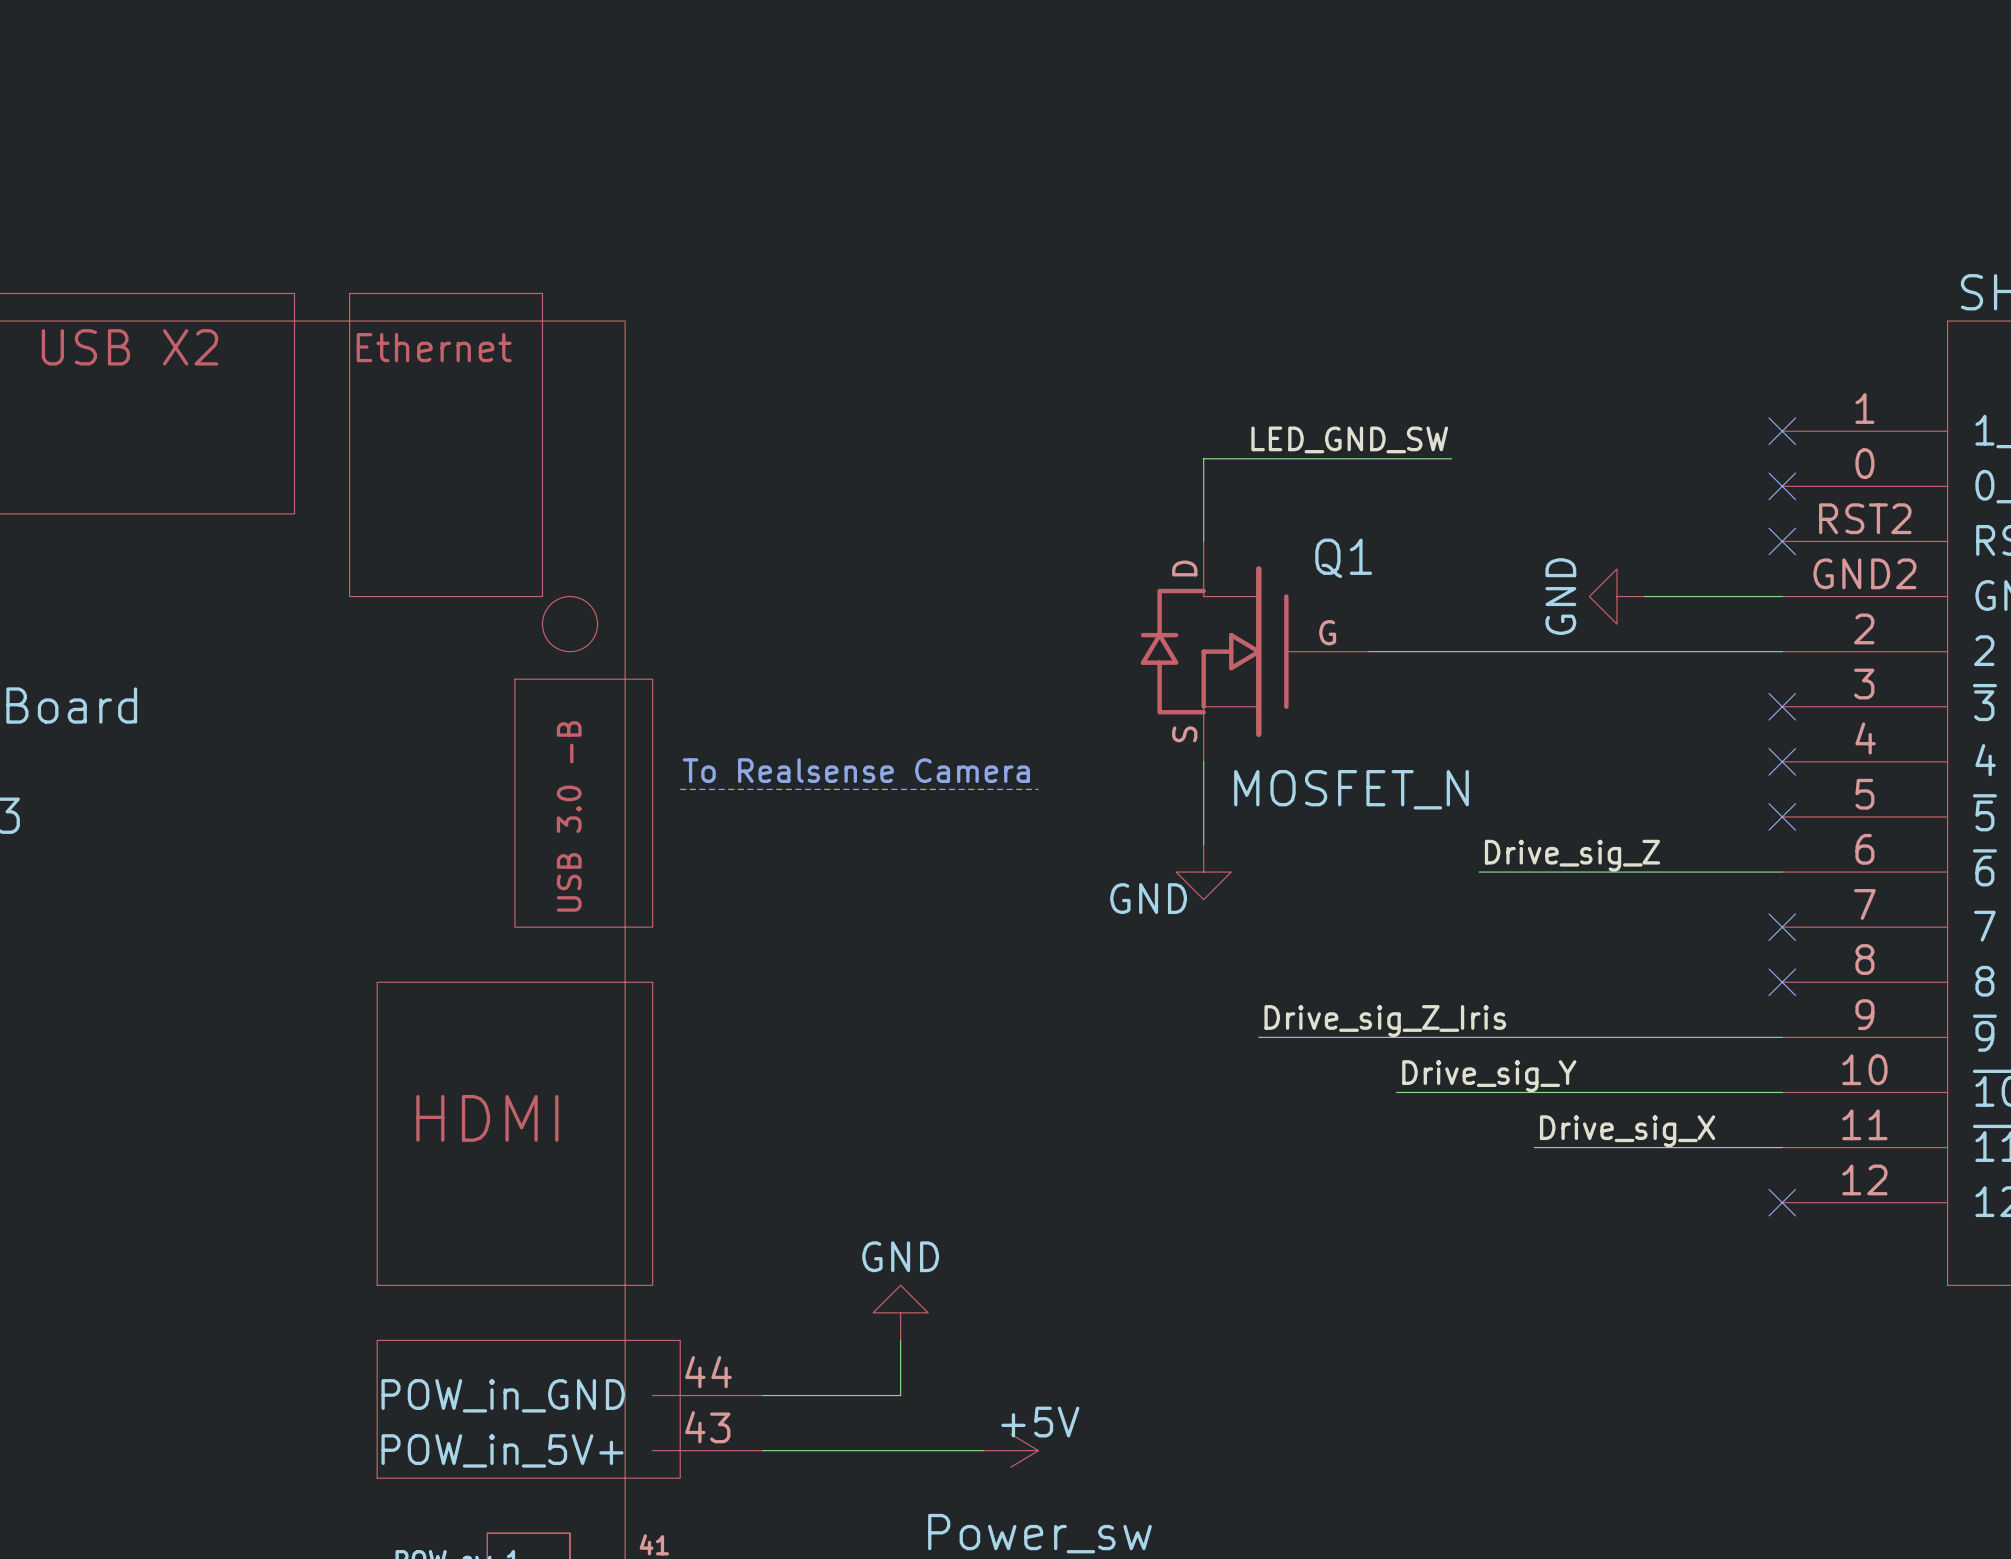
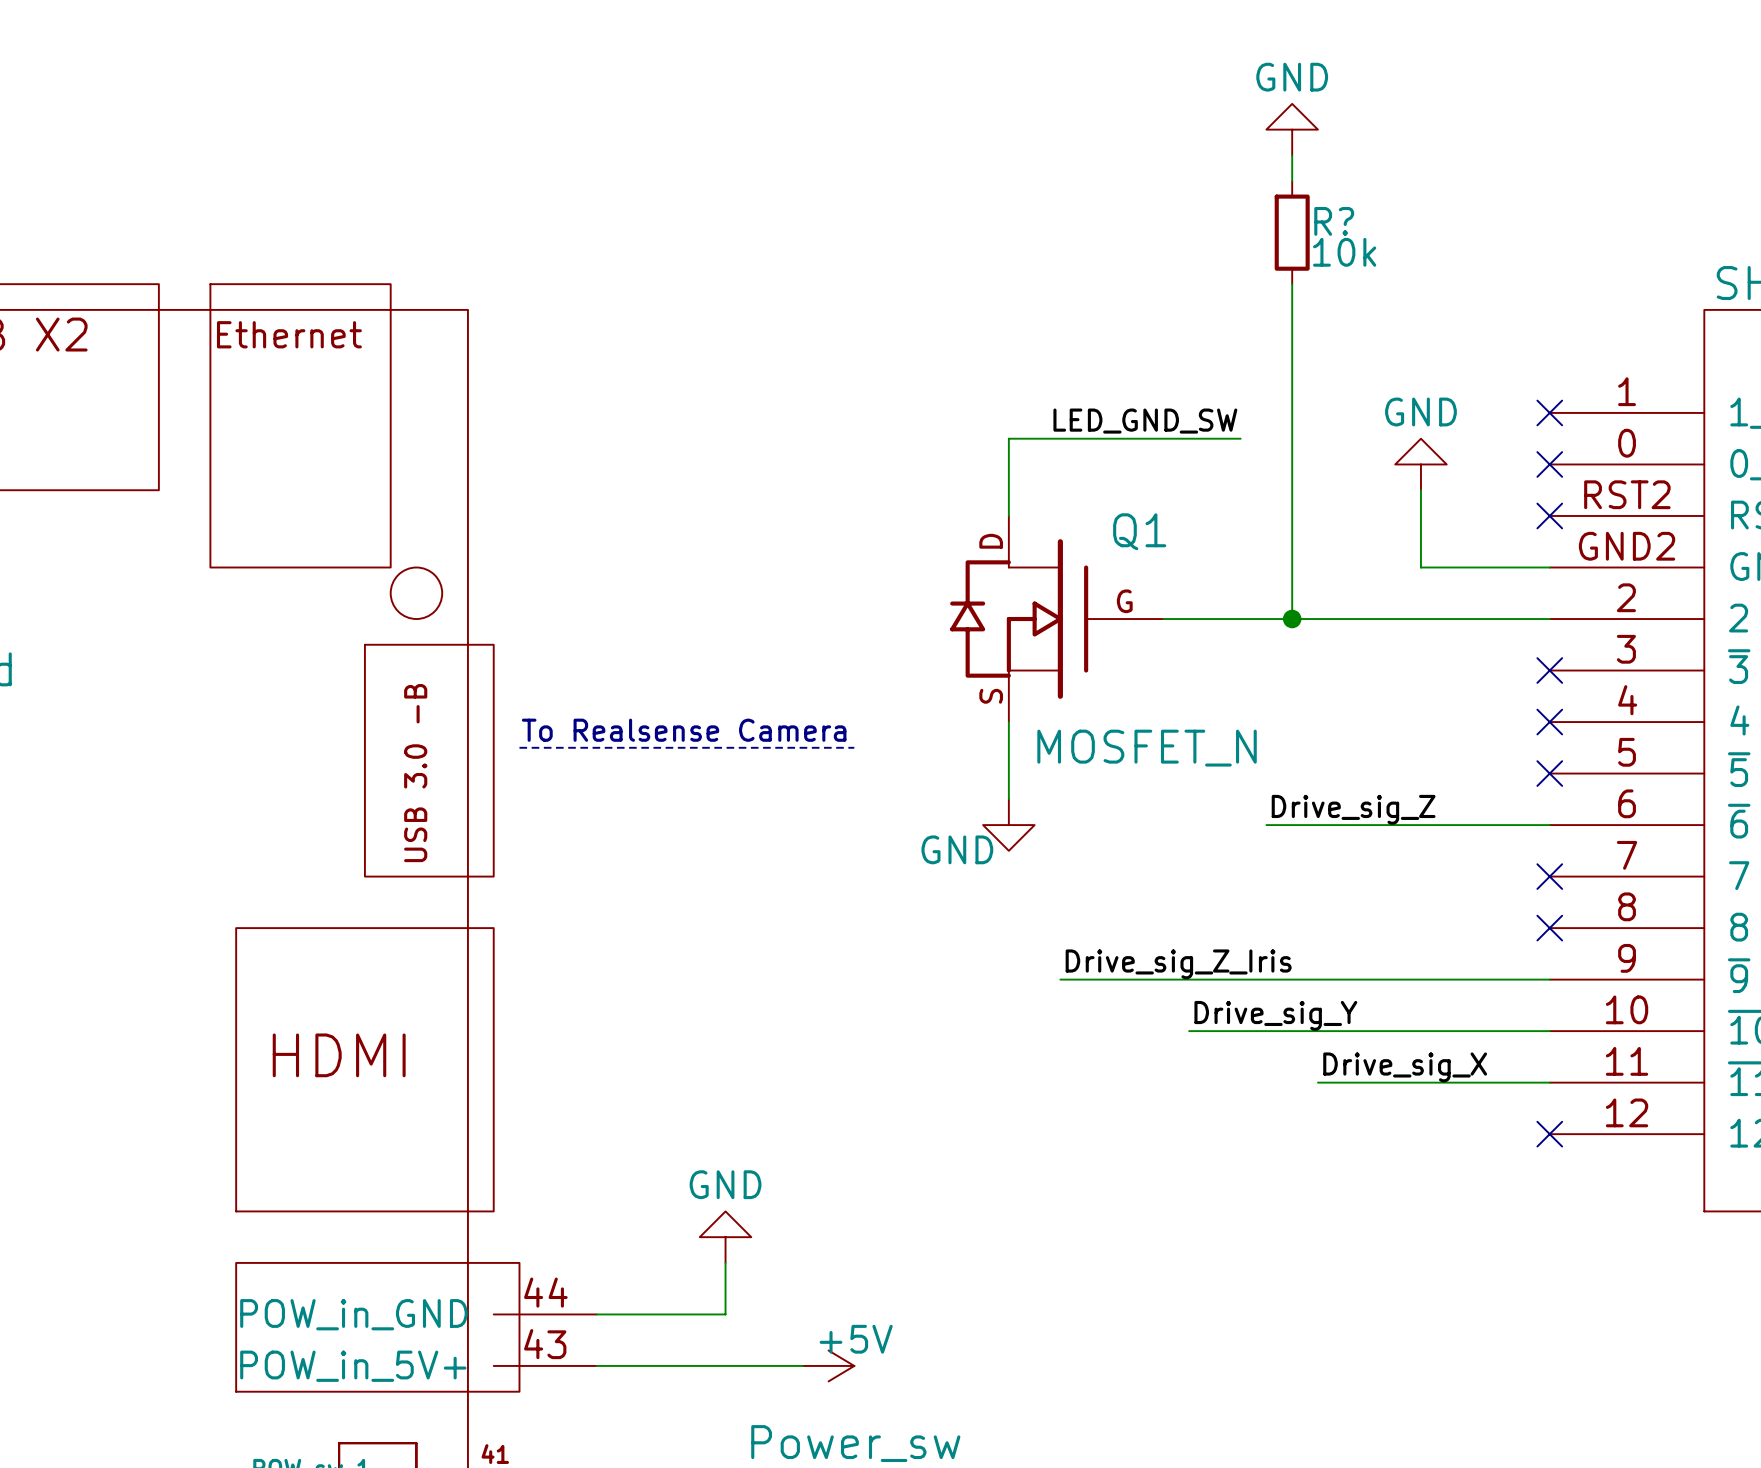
power symbol: none -> GND (1292, 129)
wire: none -> (1292, 155) (1292, 181)
R?: none -> 10k (1292, 232)
wire: none -> (1292, 284) (1292, 619)
wire: none -> (1420, 490) (1420, 567)
power symbol rotation: 0° (1616, 596) -> 90° clockwise (1420, 464)
power symbol position: GND (1616, 596) -> GND (1420, 464)
junction: none -> (1292, 619)

